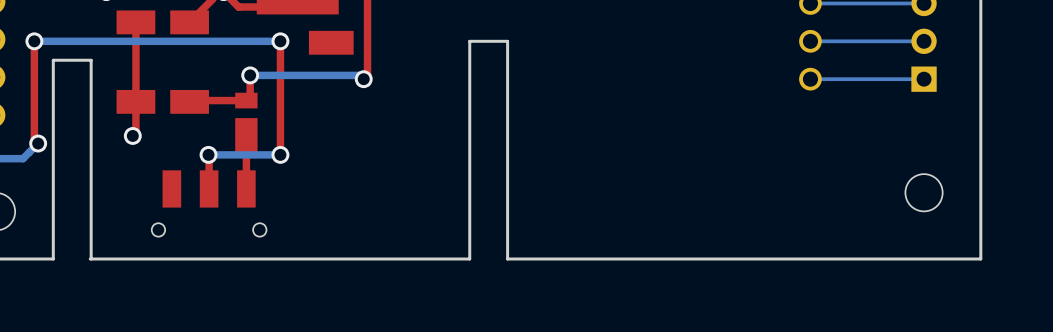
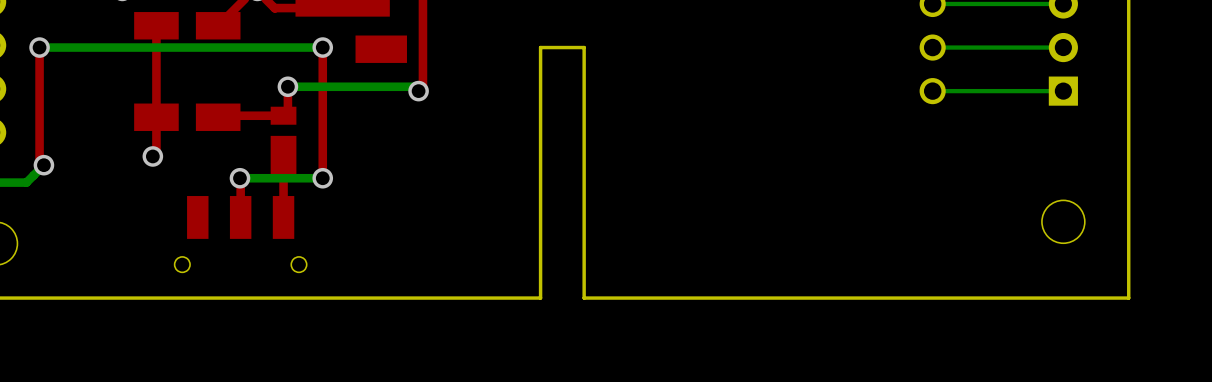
board edge: (91, 259) (91, 60) (53, 60) (53, 259) -> (103, 298) (61, 298)

